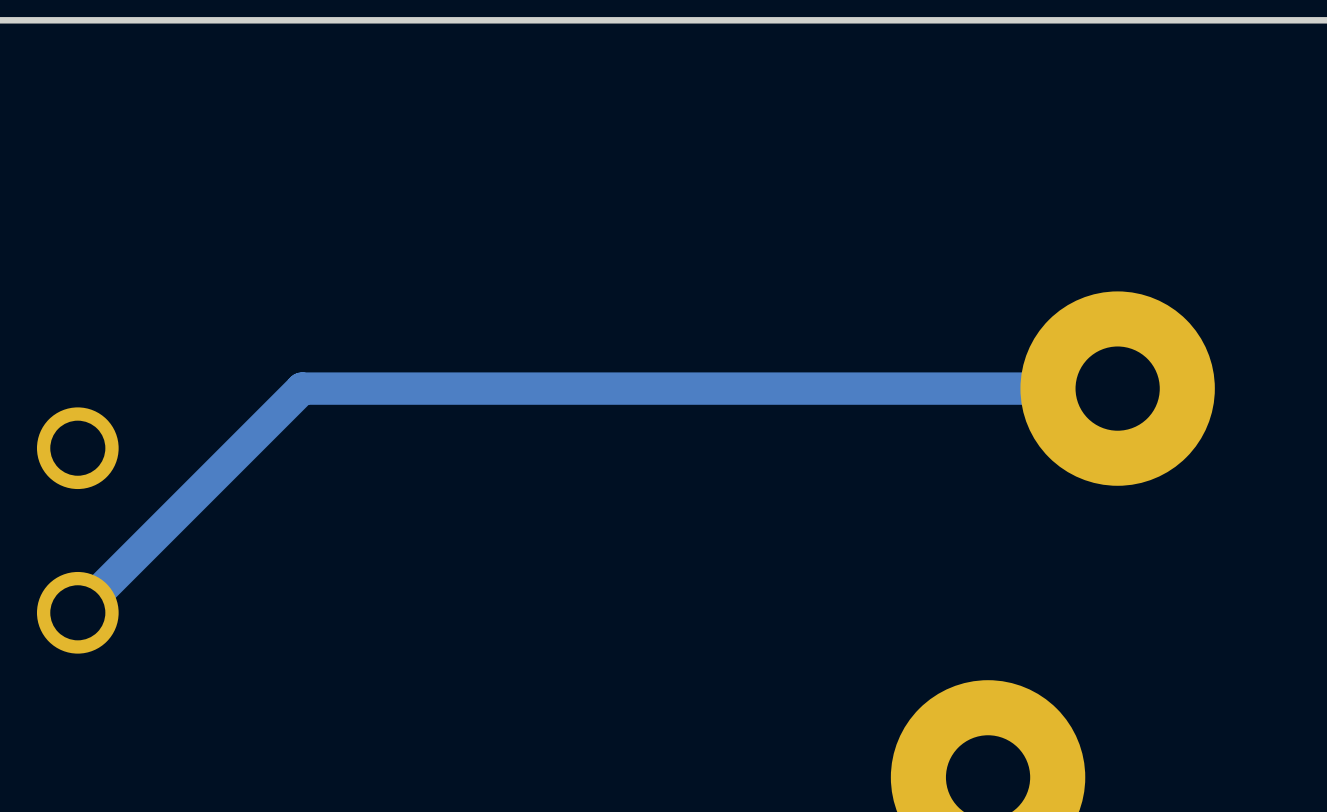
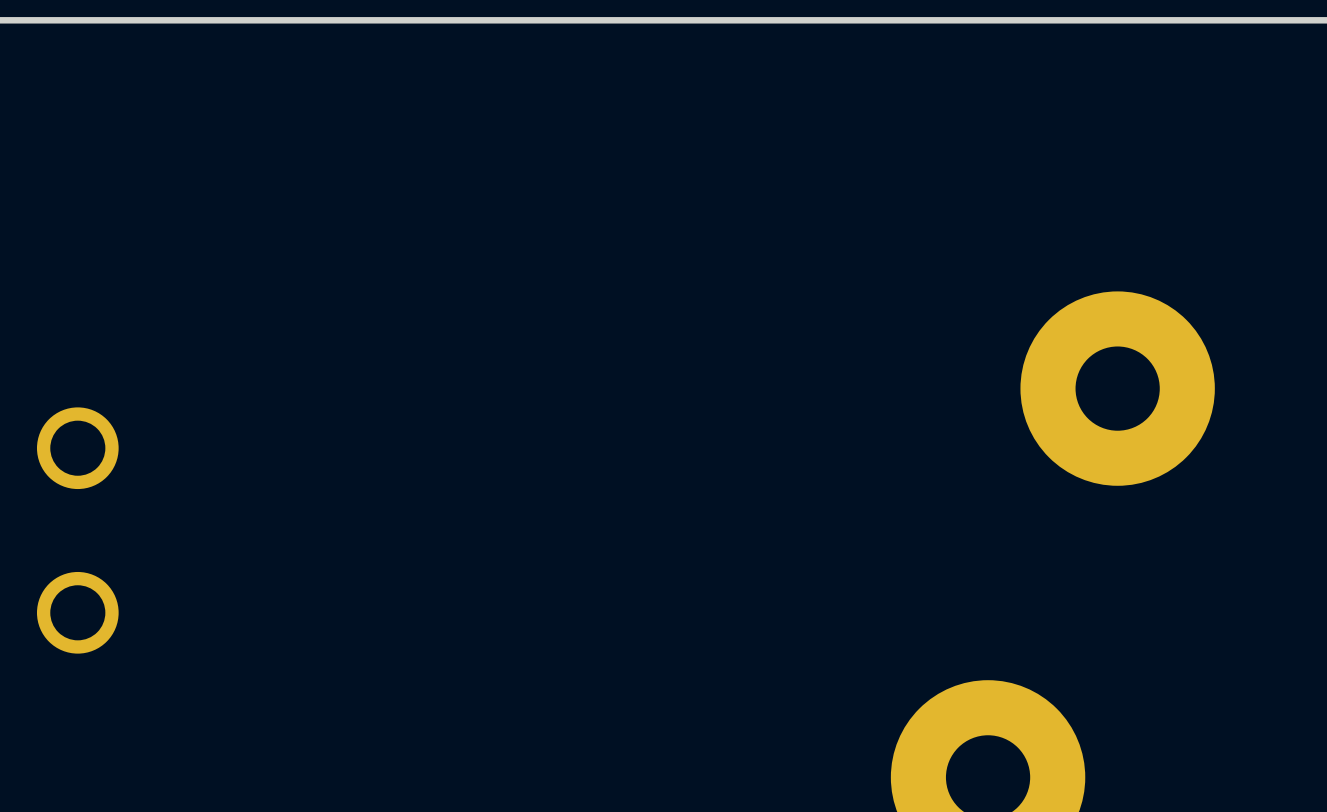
track: (1117, 388) (302, 388) (77, 612) -> none

